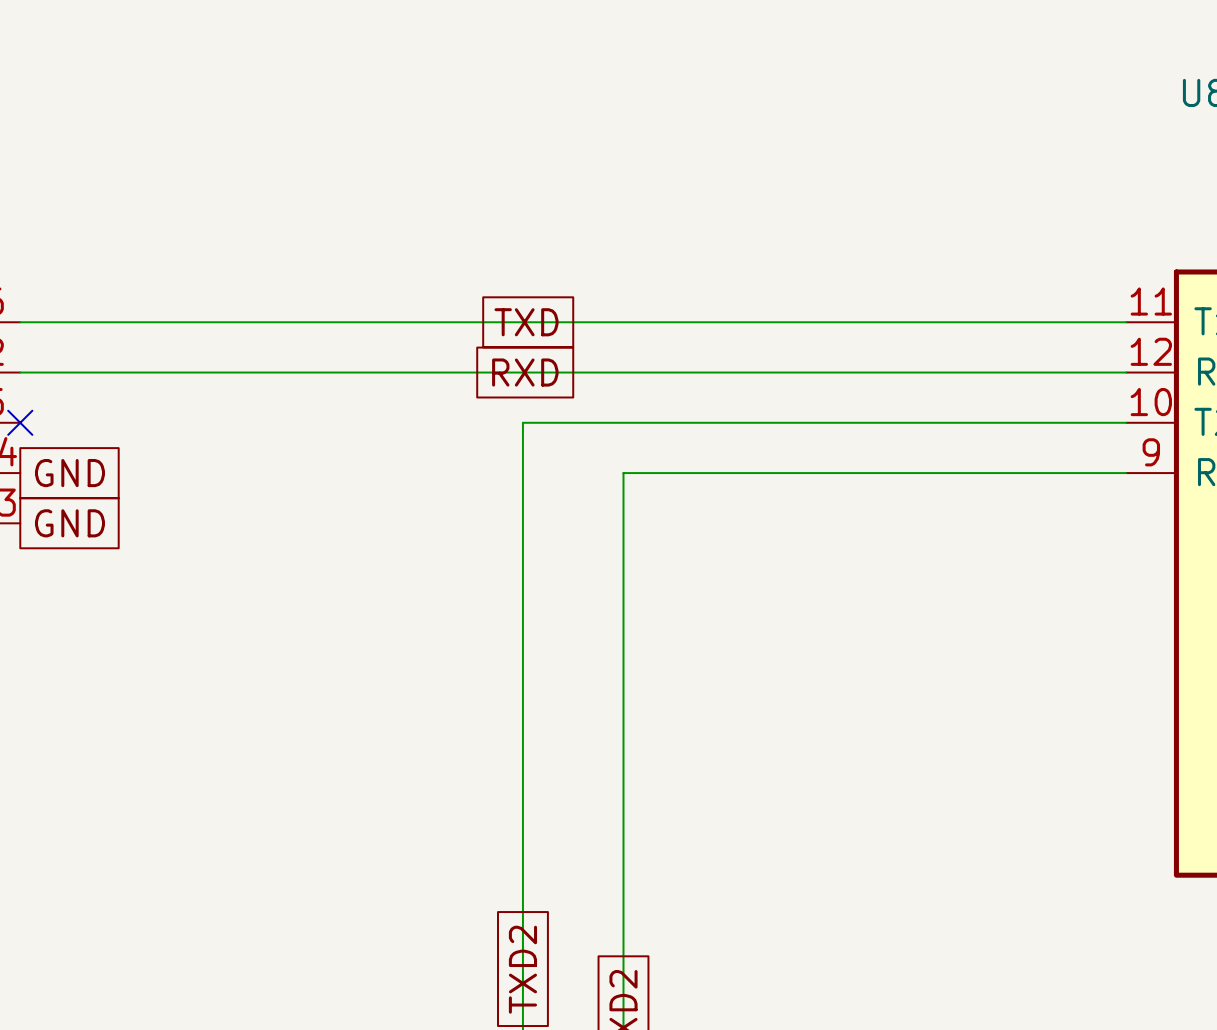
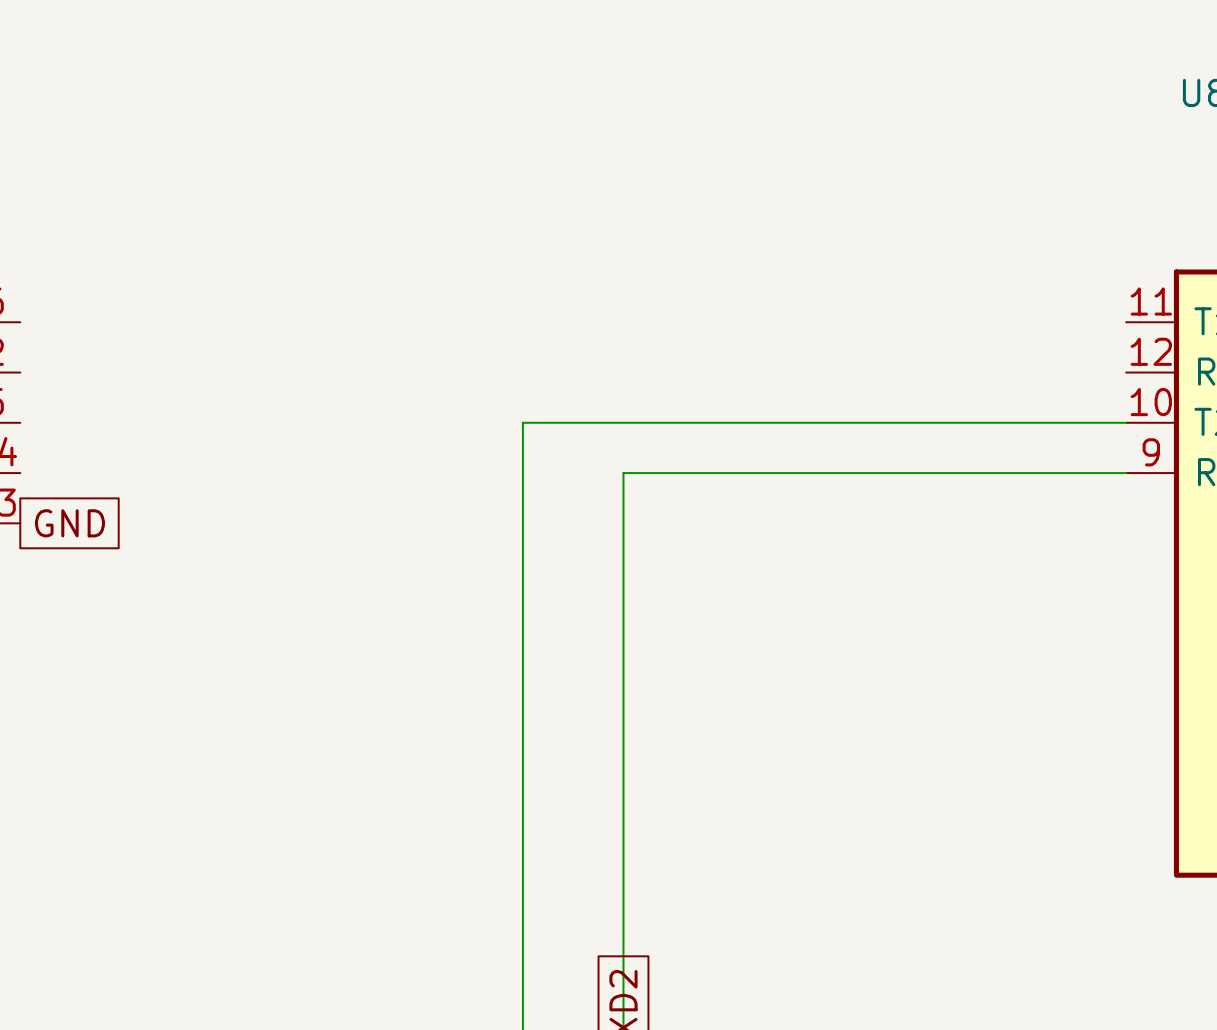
wire: (20, 322) (1126, 322) -> none
global label: TXD (526, 322) -> none
wire: (20, 372) (1126, 372) -> none
global label: RXD (525, 372) -> none
no-connect mark: (20, 422) -> none
global label: GND (69, 473) -> none
global label: TXD2 (522, 969) -> none

